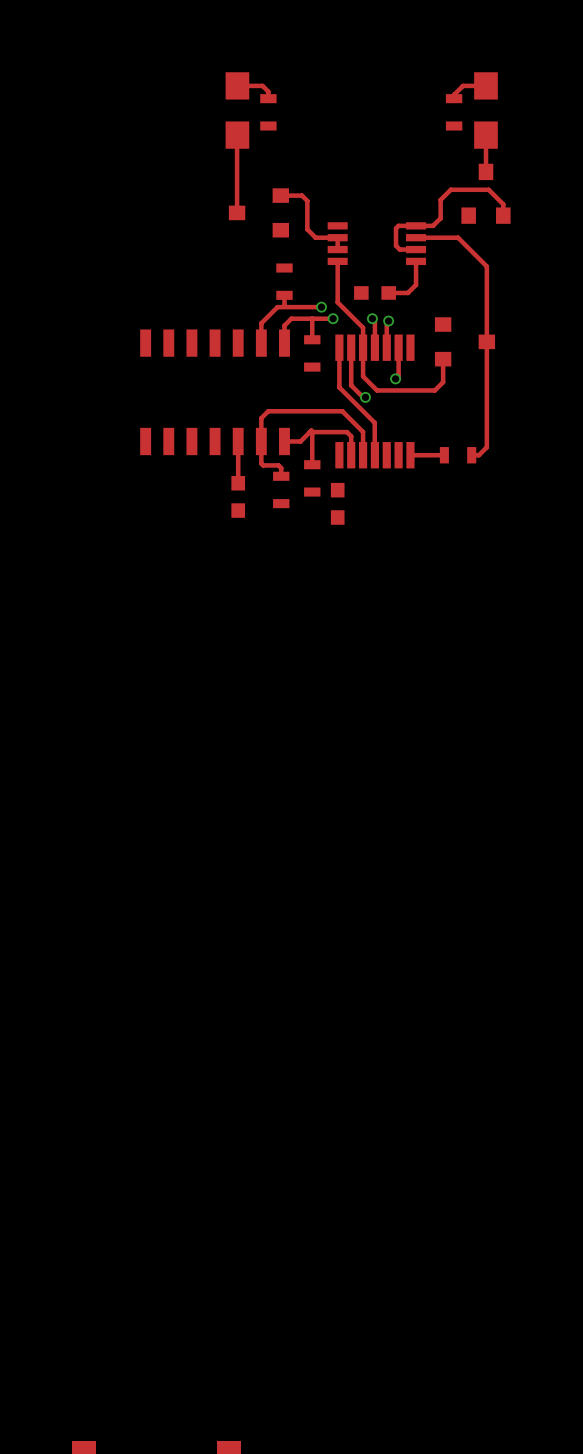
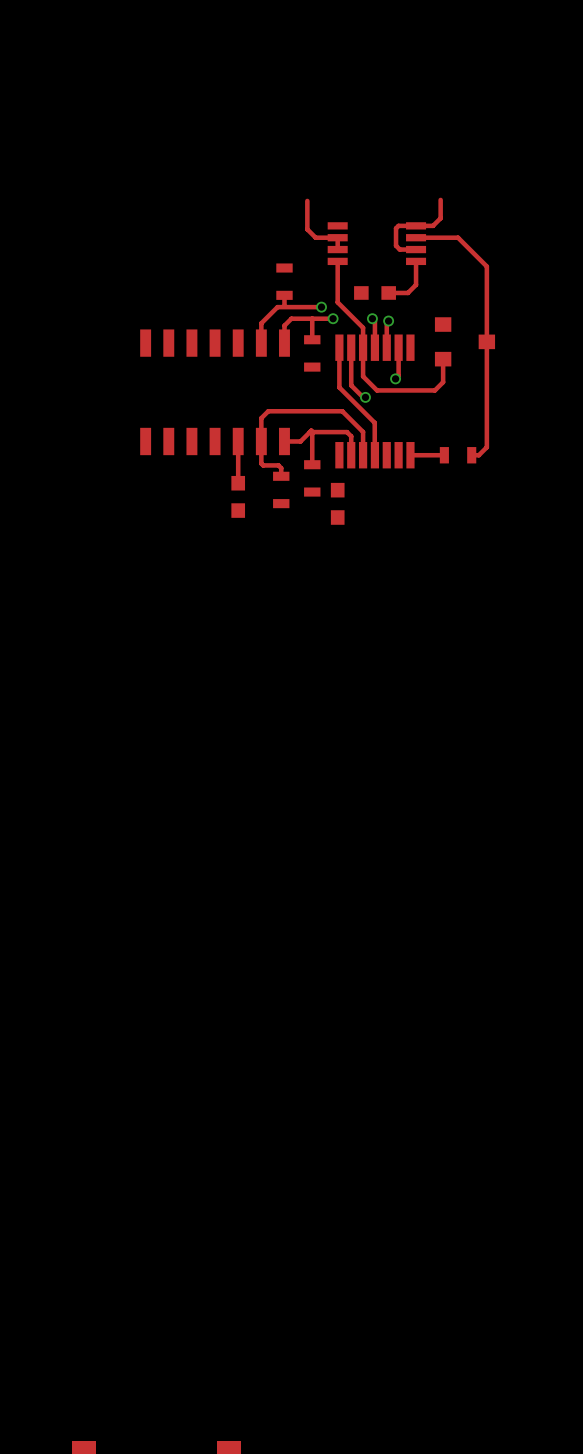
top track: (237, 85) (262, 85) (268, 91) (268, 98) -> none
top track: (485, 85) (463, 85) (454, 94) (454, 98) -> none
part: (237, 110) -> none
part: (485, 110) -> none
part: (268, 112) -> none
part: (454, 112) -> none
top track: (237, 135) (237, 212) -> none
top track: (485, 135) (485, 171) -> none
part: (485, 193) -> none
top track: (280, 195) (301, 195) (307, 200) -> none
top track: (440, 199) (450, 189) (488, 189) (503, 204) (503, 215) -> none
part: (258, 212) -> none

